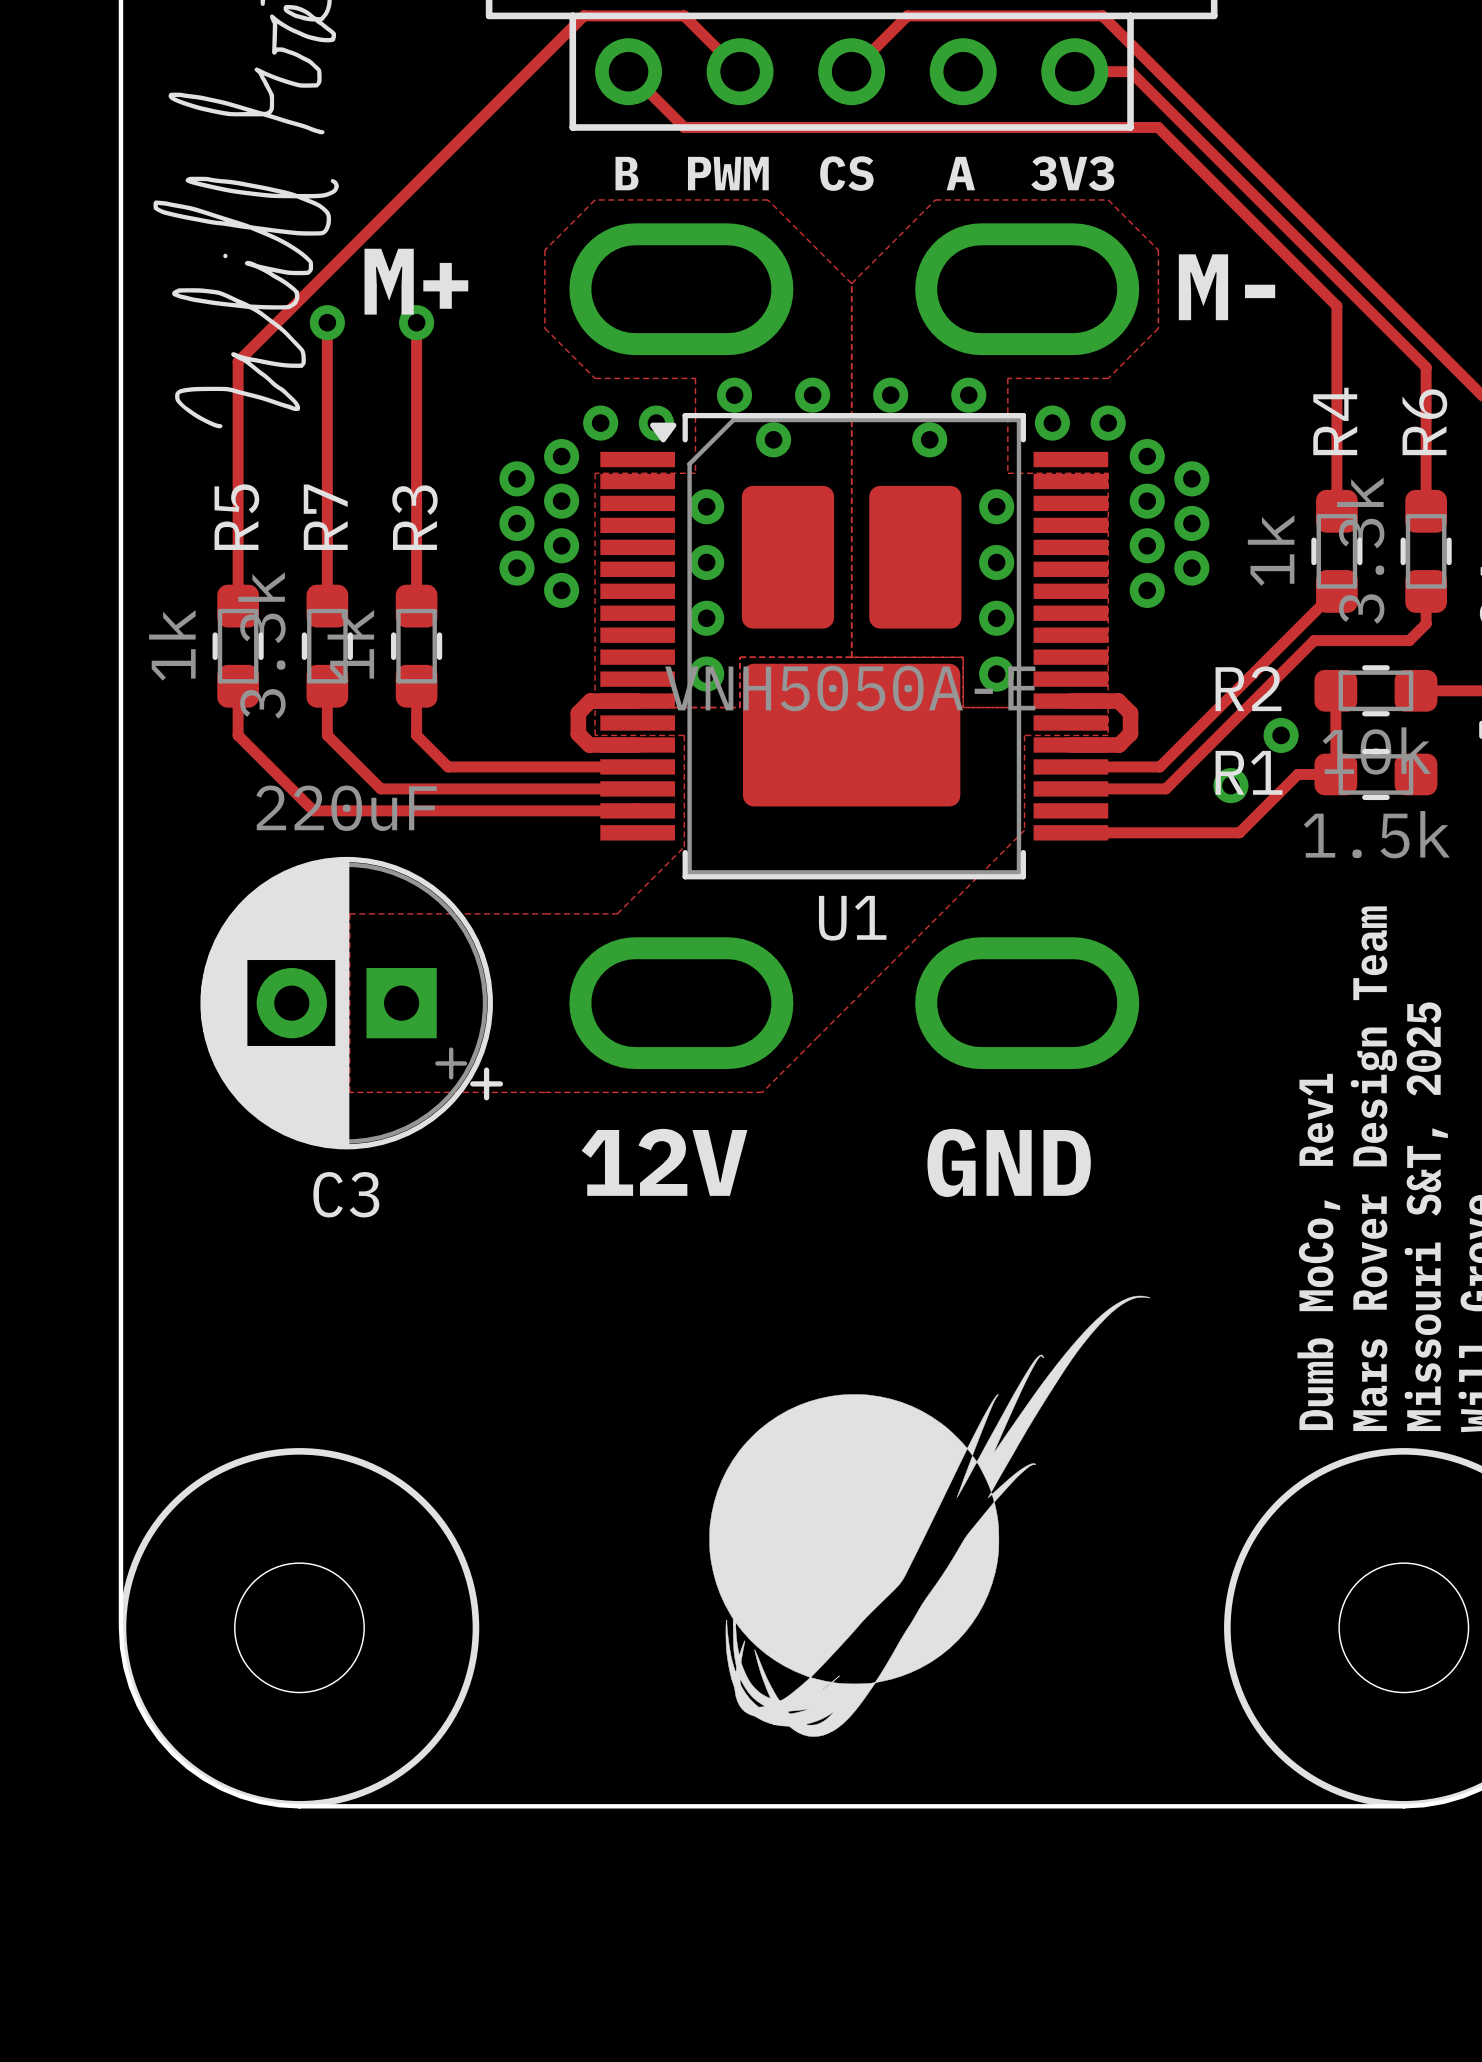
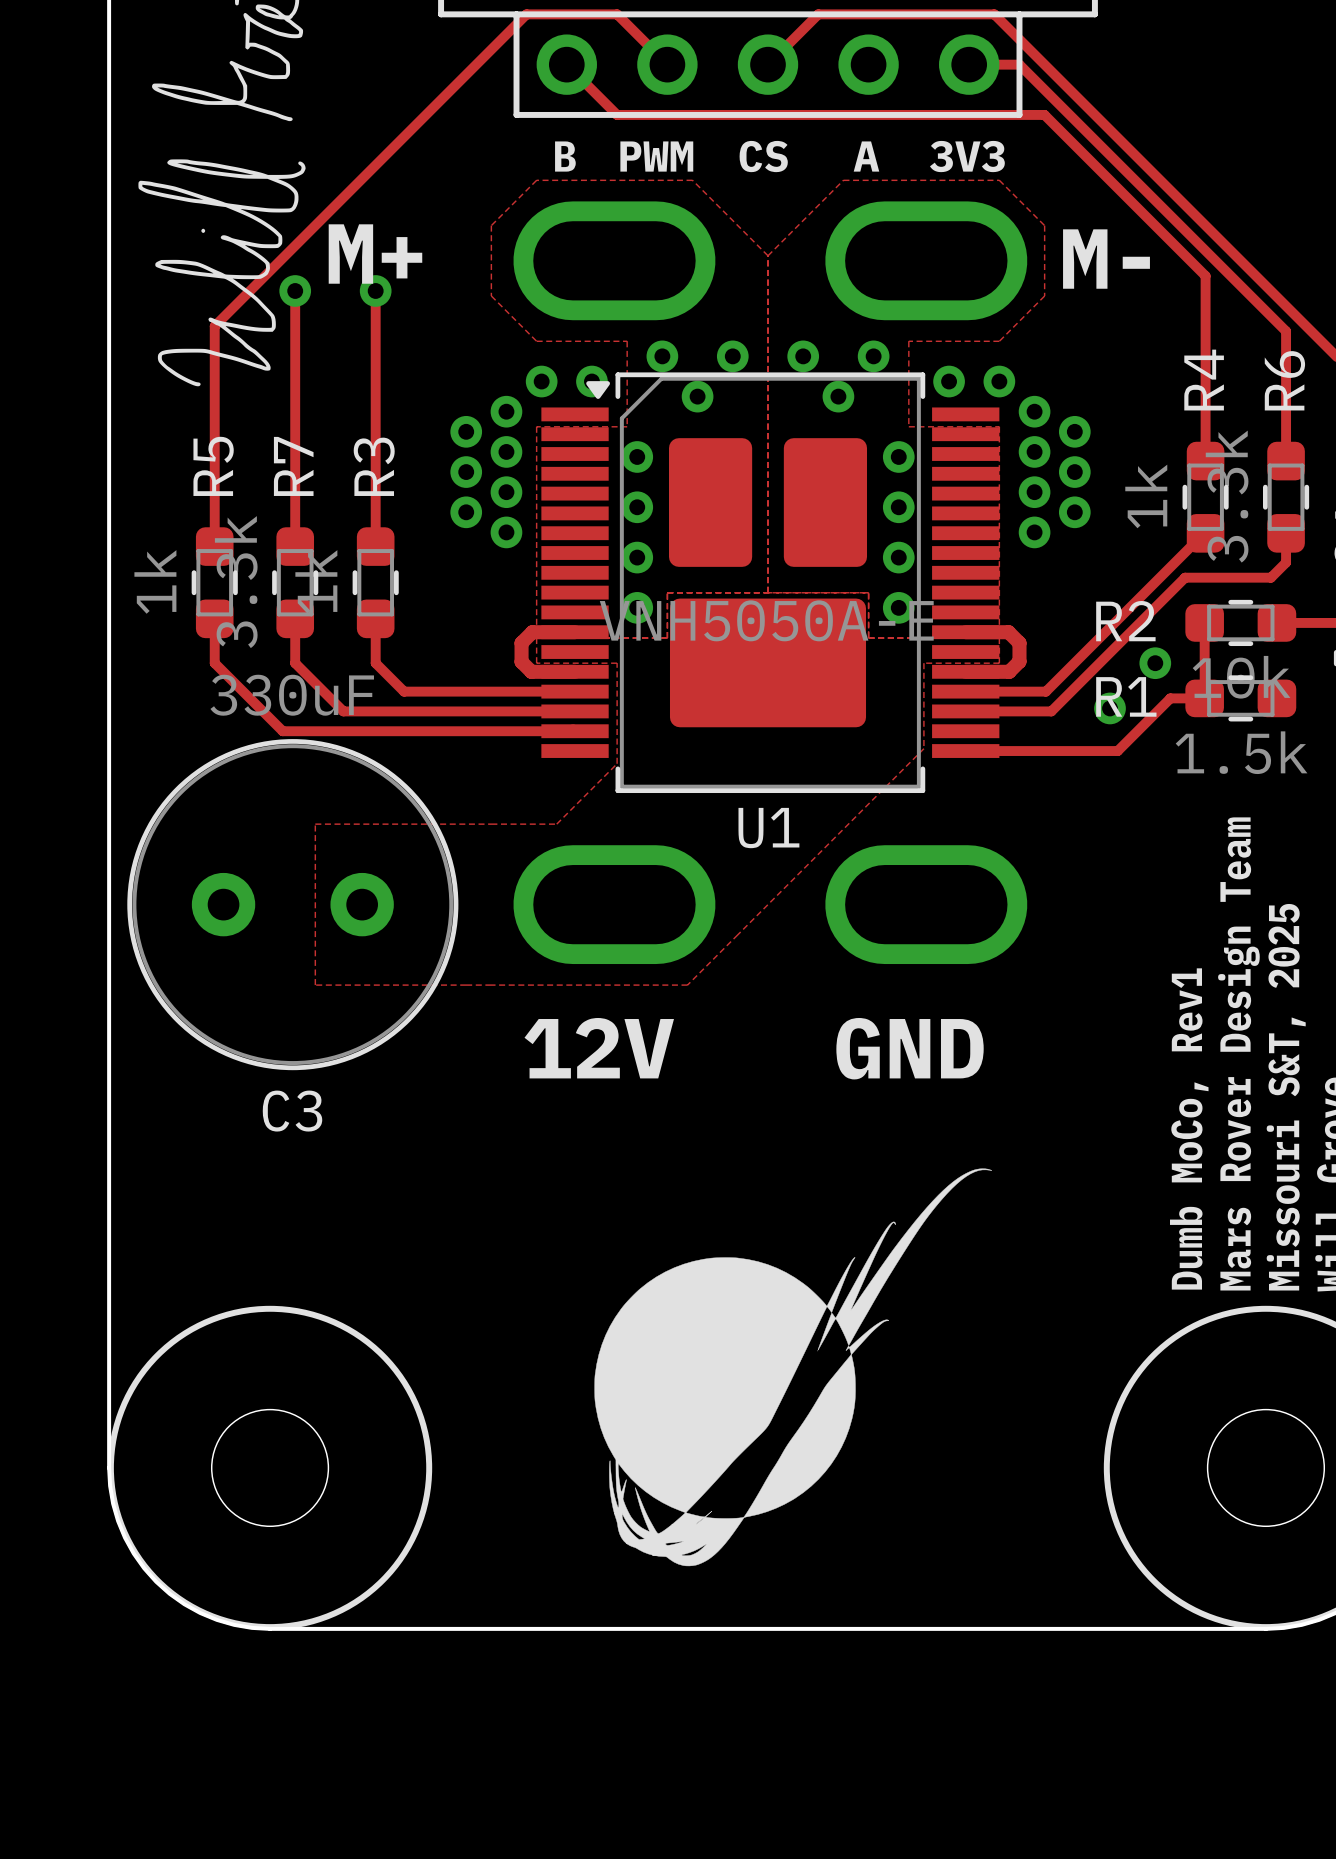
C3 value: 220uF (346, 808) -> 330uF (292, 695)
C3 footprint: [200, 856, 504, 1150] -> [127, 739, 459, 1071]
drawing position: (929, 1516) -> (793, 1367)

